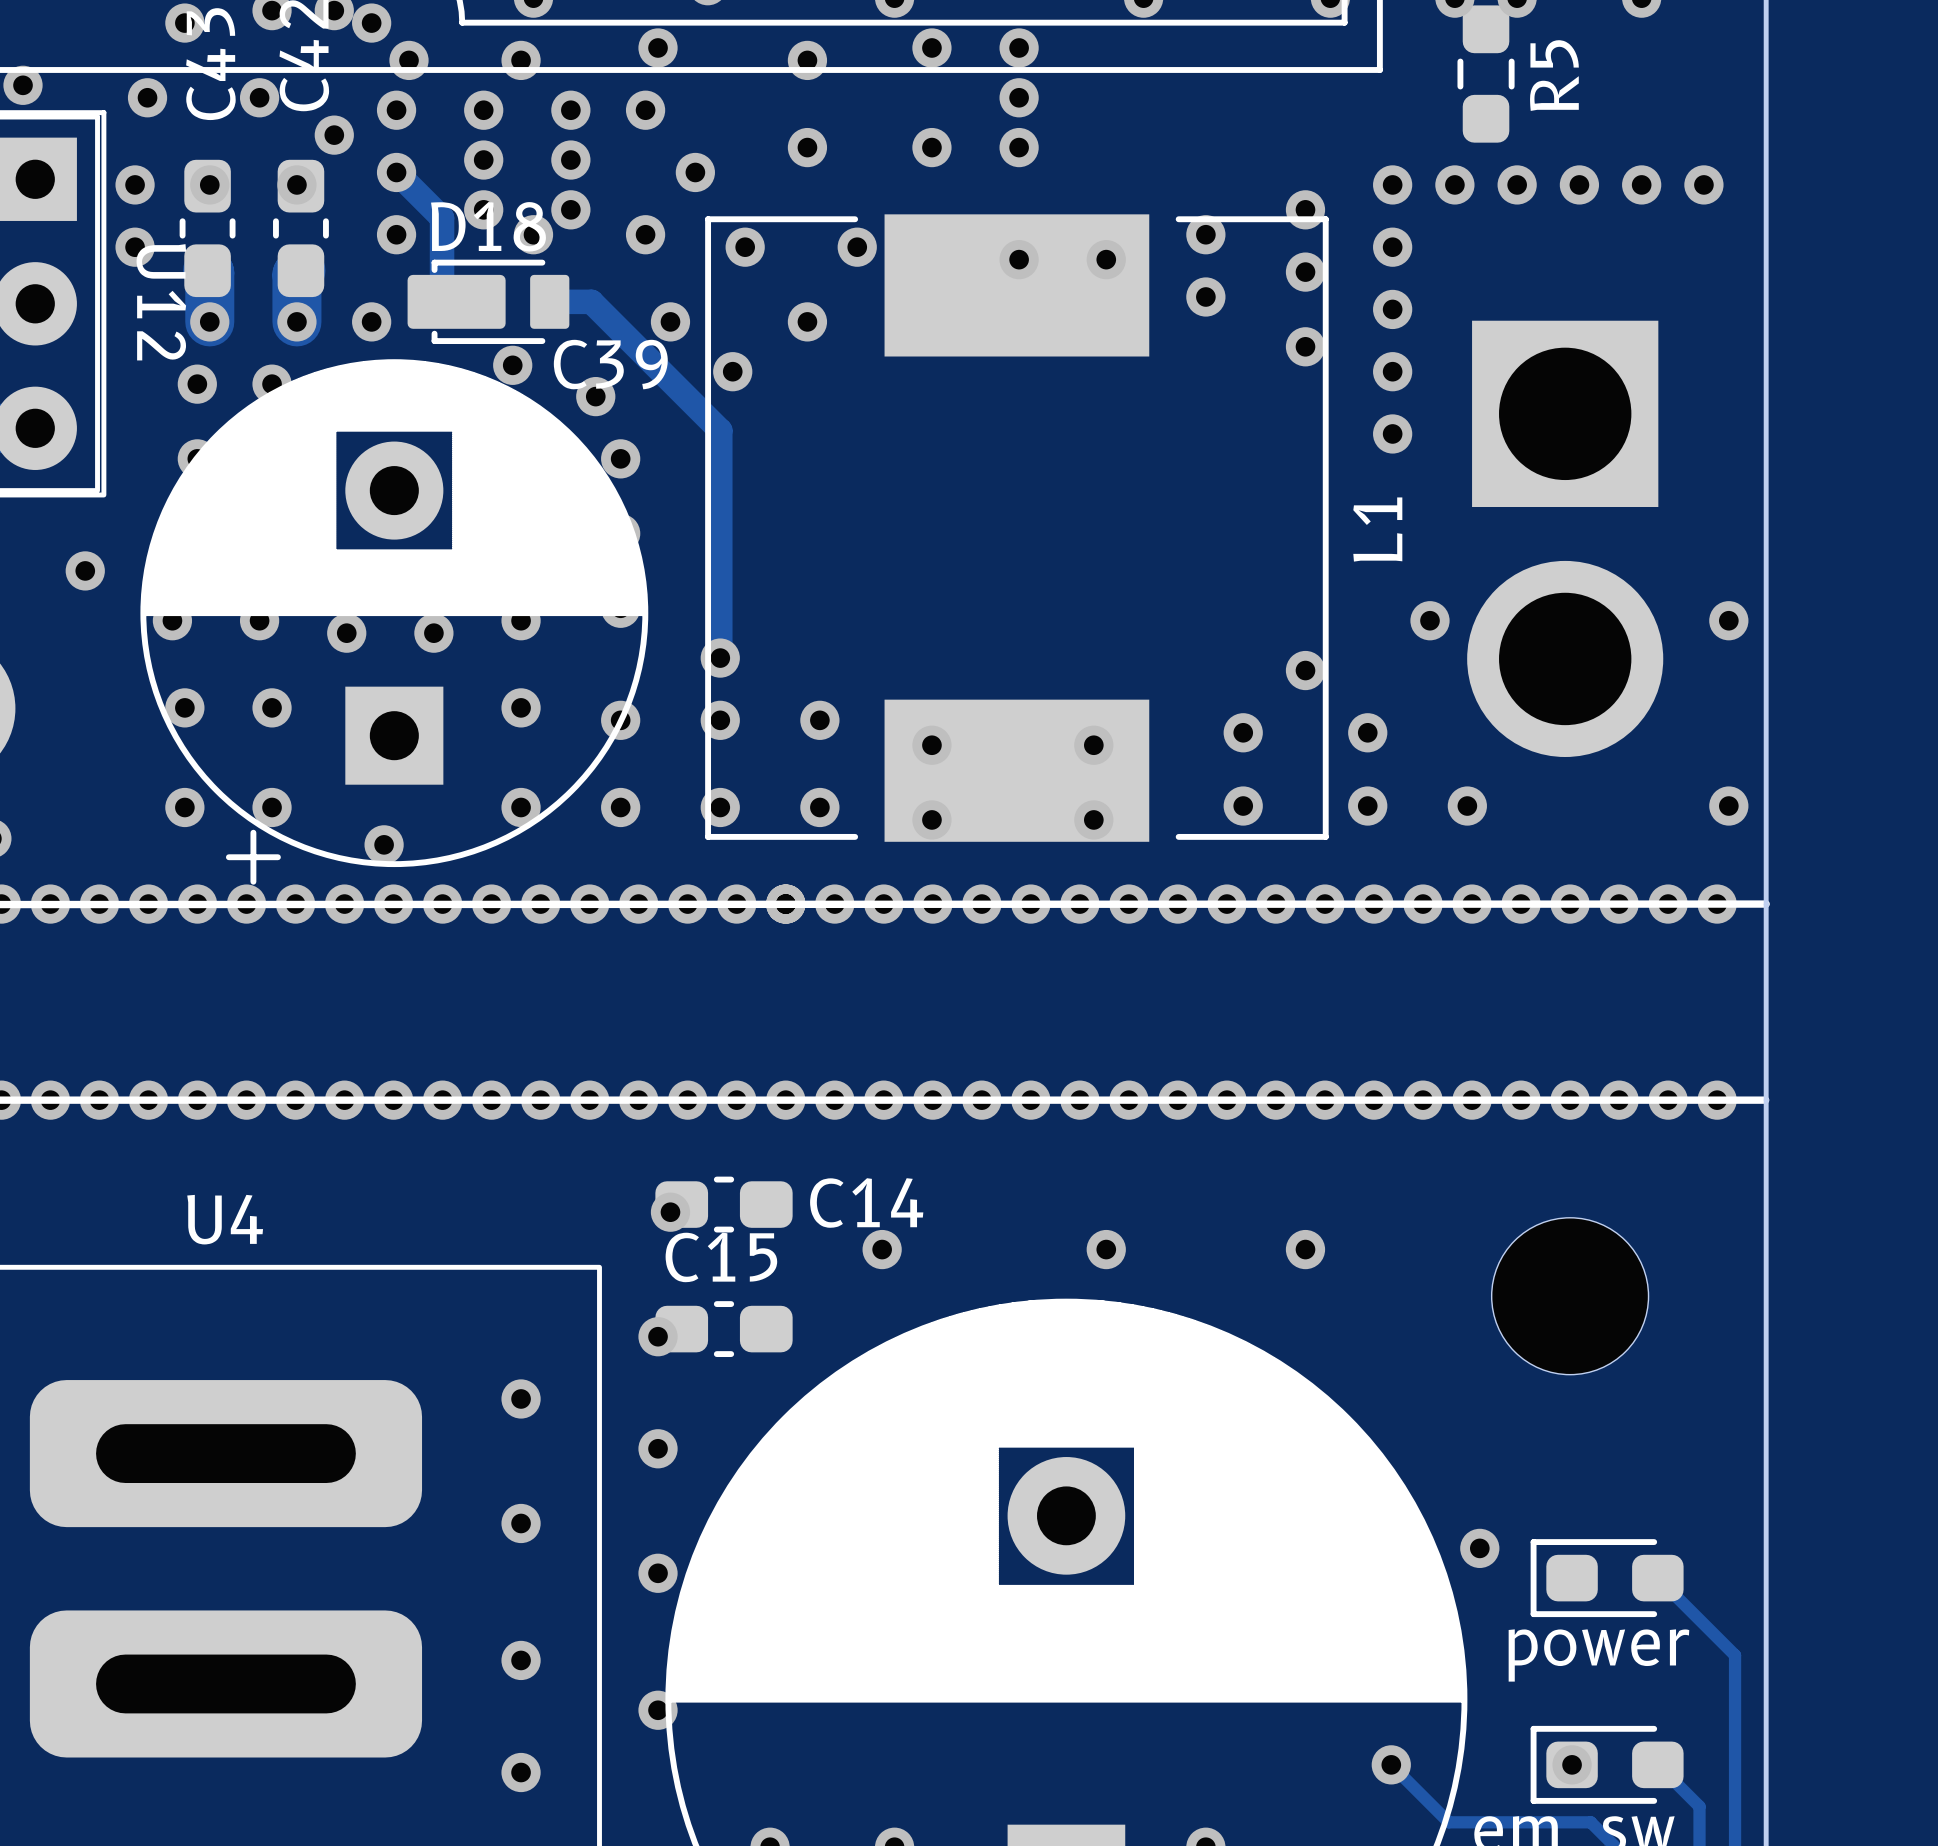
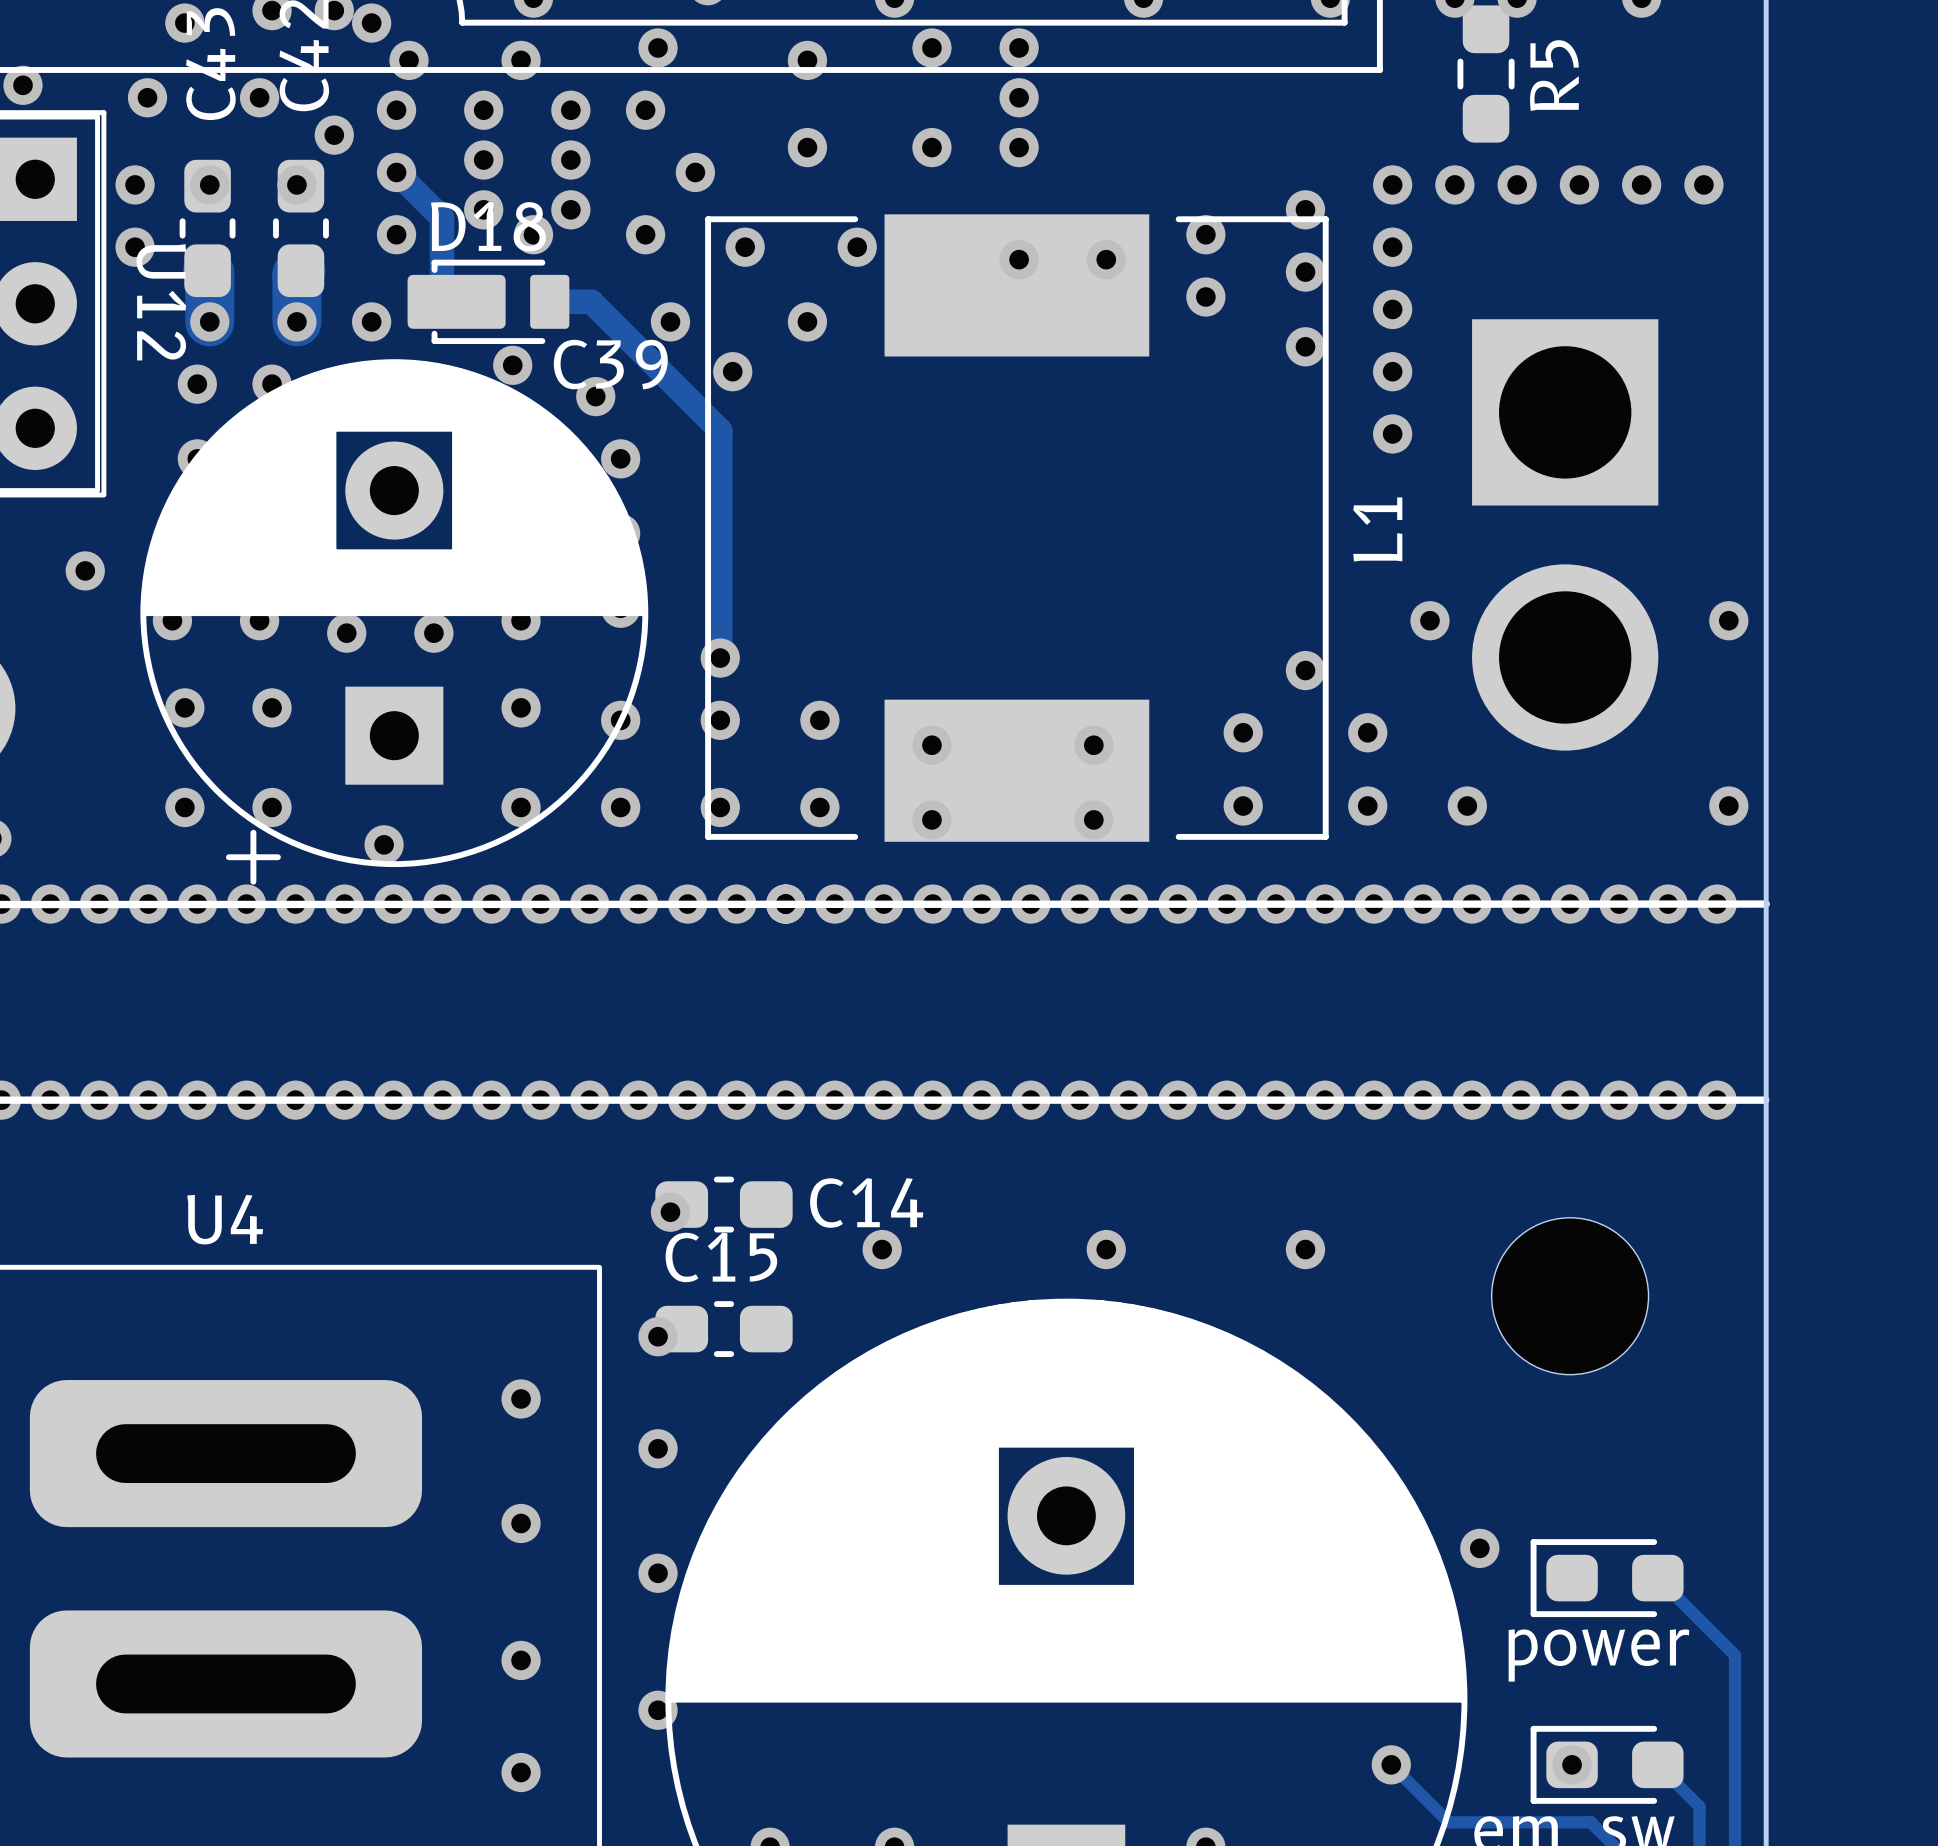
part footprint: [1467, 320, 1664, 758] -> [1472, 319, 1659, 751]

